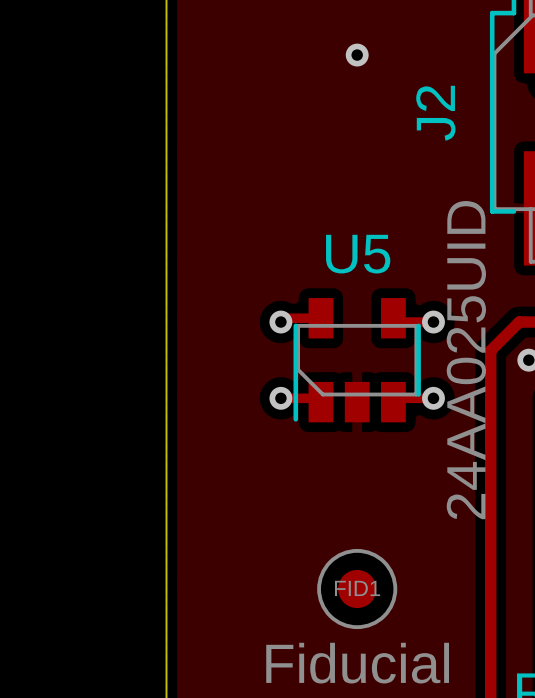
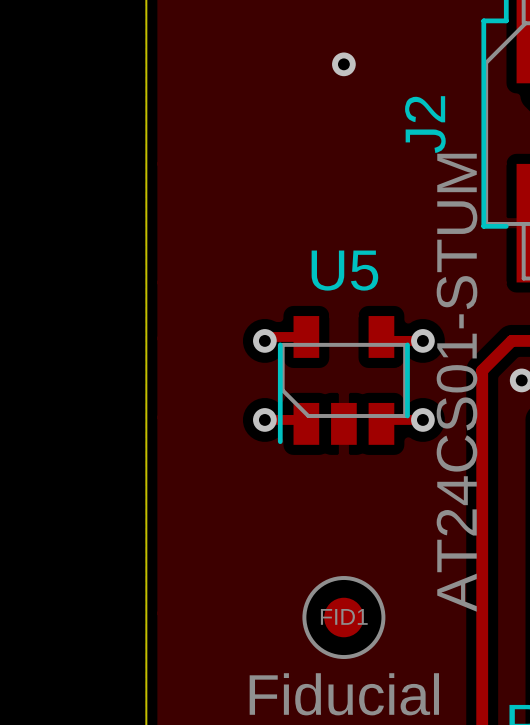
U5 value: 24AA025UID (466, 360) -> AT24CS01-STUM (457, 382)

